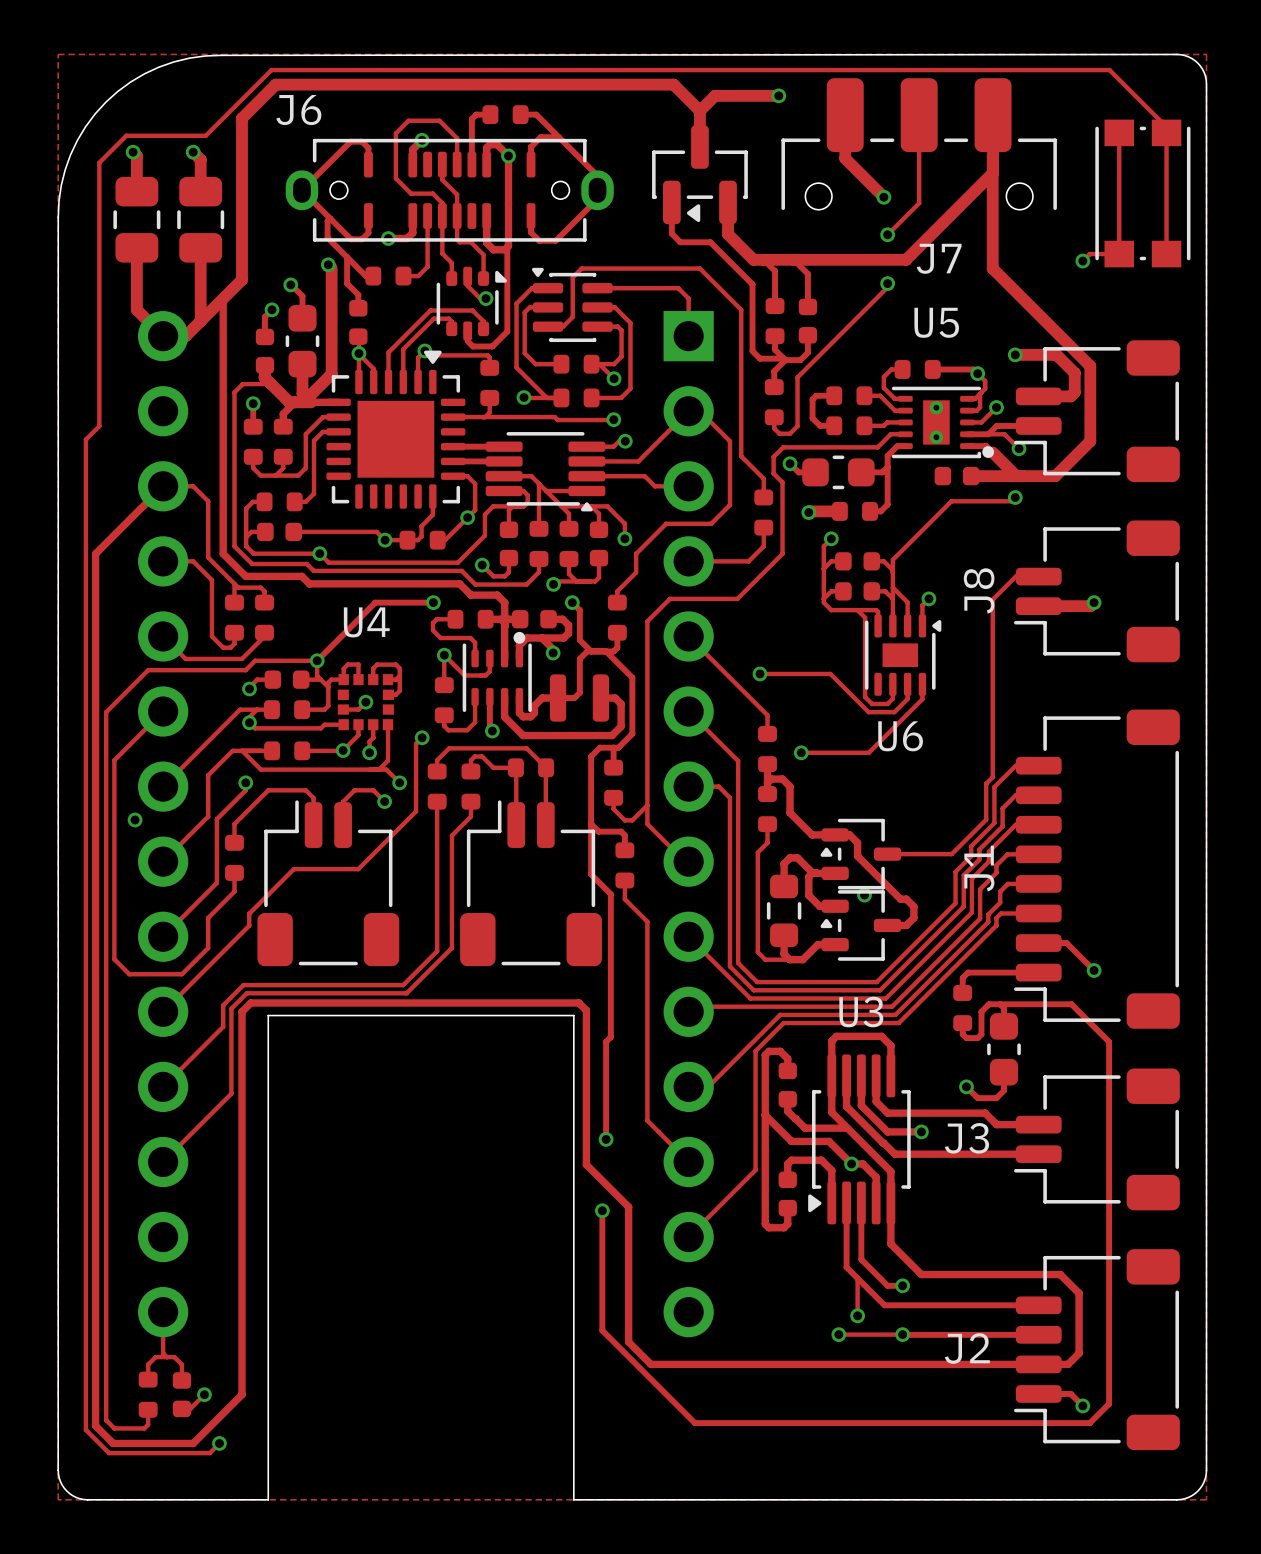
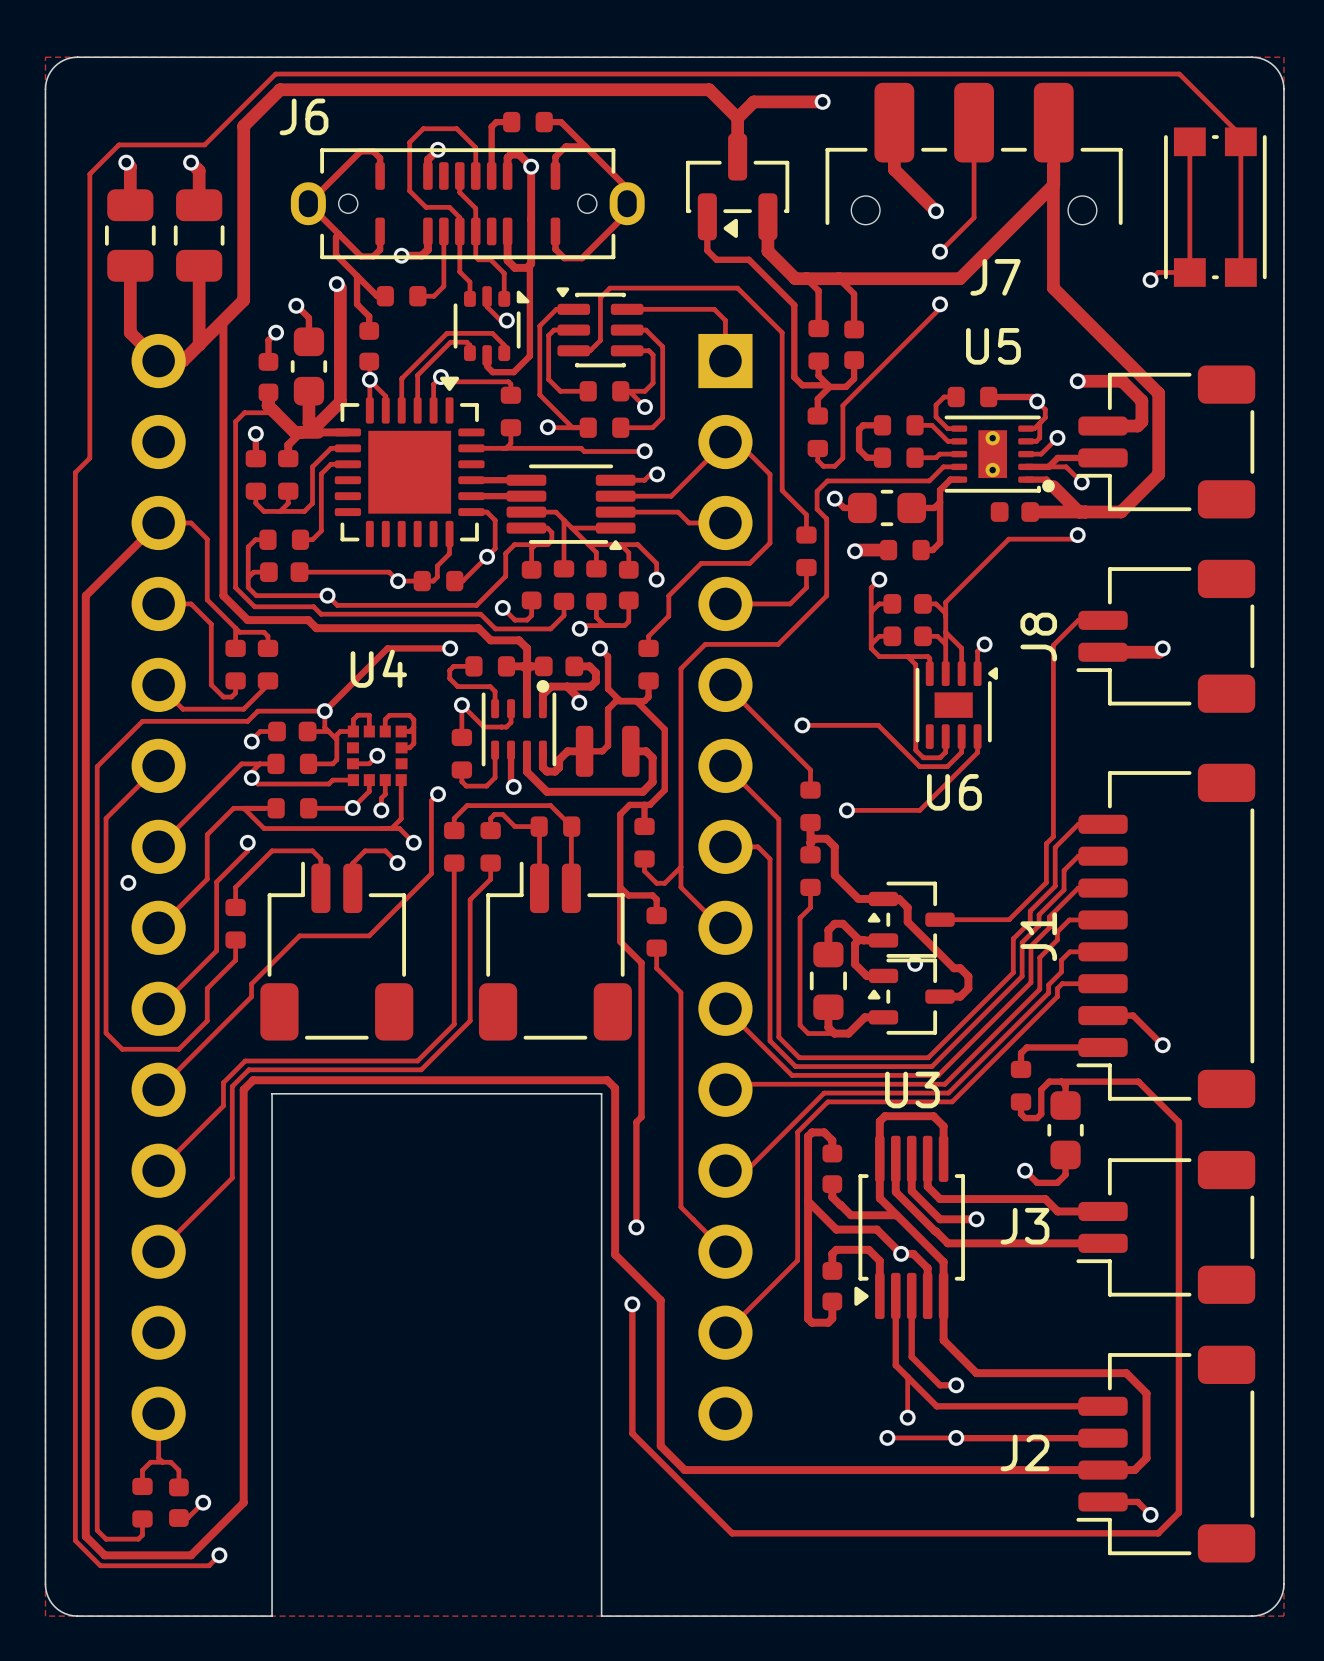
board edge: (1176, 54) (205, 55) (173, 61) (144, 73) (117, 91) (95, 114) (77, 140) (65, 169) (61, 185) (58, 217) (58, 1470) -> (1252, 57) (77, 57) (63, 60) (52, 69) (47, 78) (45, 89) (45, 1584)

